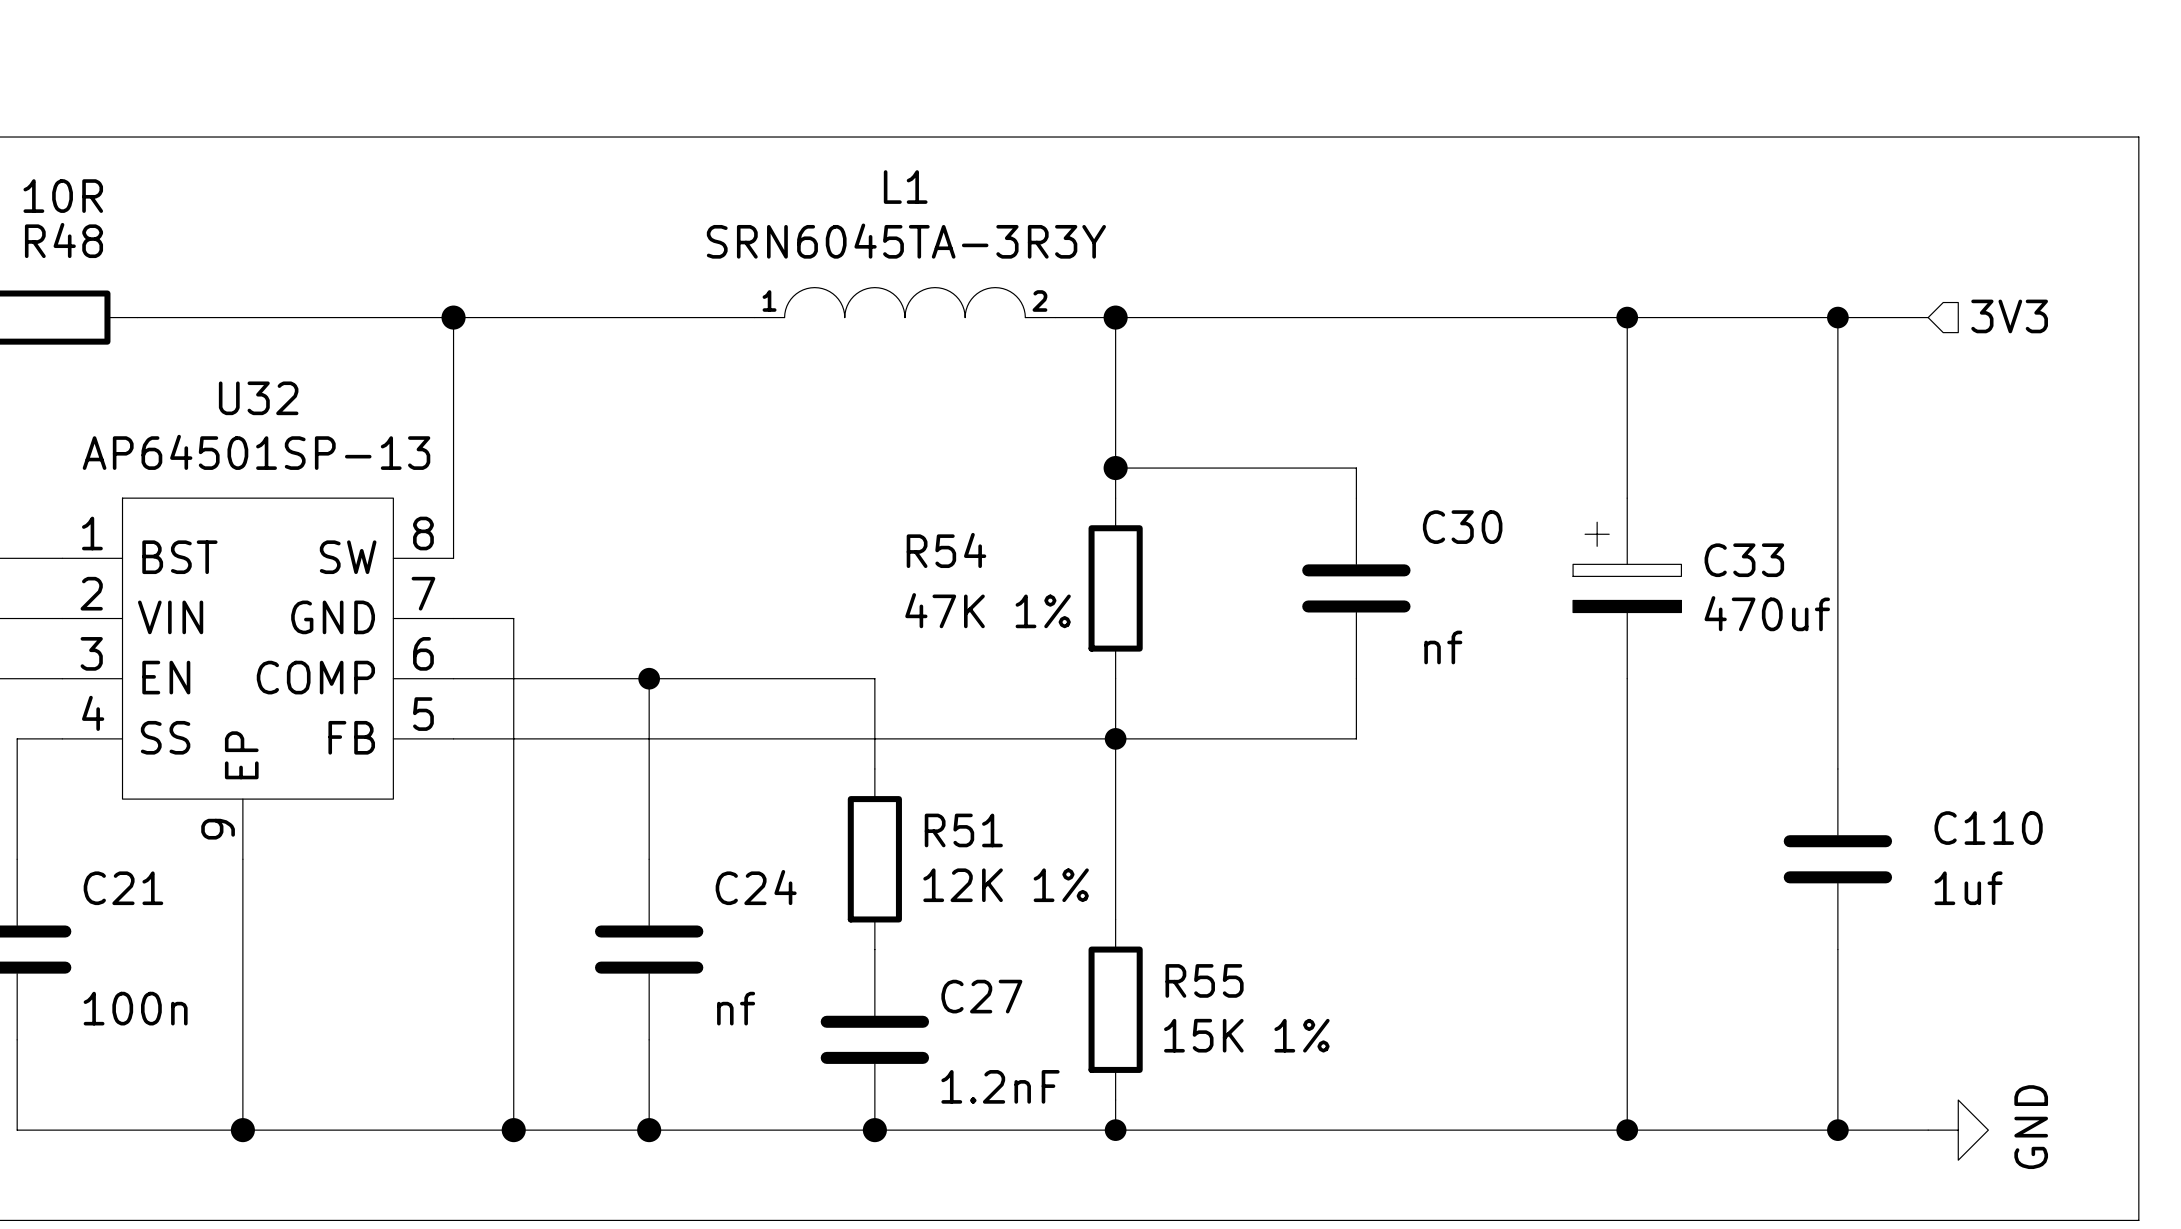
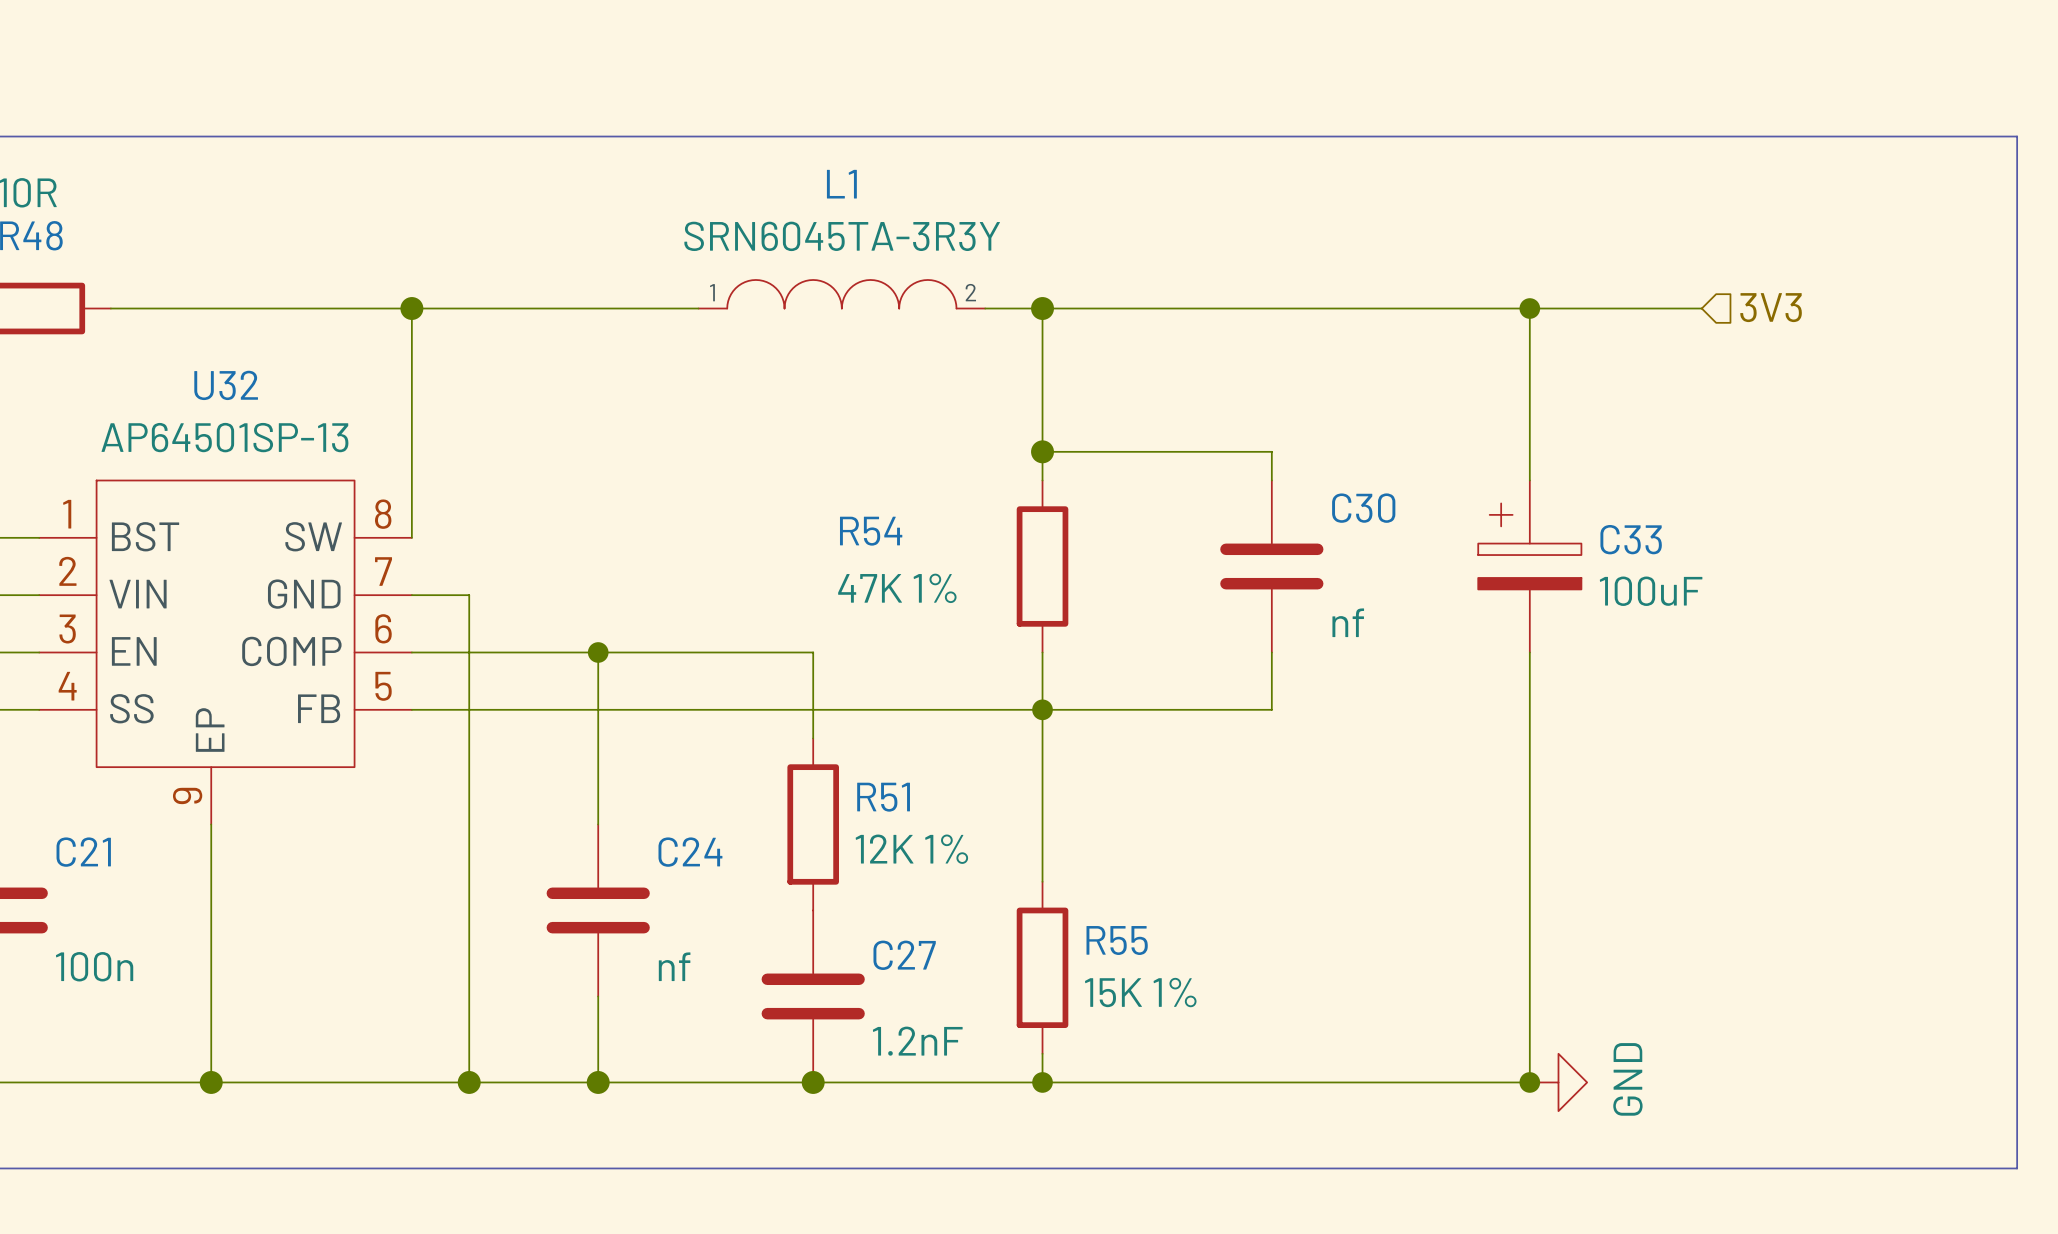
hierarchical label position: 3V3 (2009, 316) -> 3V3 (1771, 307)
wire: (1807, 317) (1928, 317) -> none
wire: (1837, 317) (1837, 768) -> none
junction: (1837, 317) -> none
C33 value: 470uf (1767, 613) -> 100uF (1651, 591)
C110: 1uf (1837, 859) -> none
wire: (1837, 949) (1837, 1130) -> none
wire: (1627, 1130) (1928, 1130) -> none
junction: (1837, 1130) -> none
power symbol position: GND (1958, 1130) -> GND (1558, 1082)

